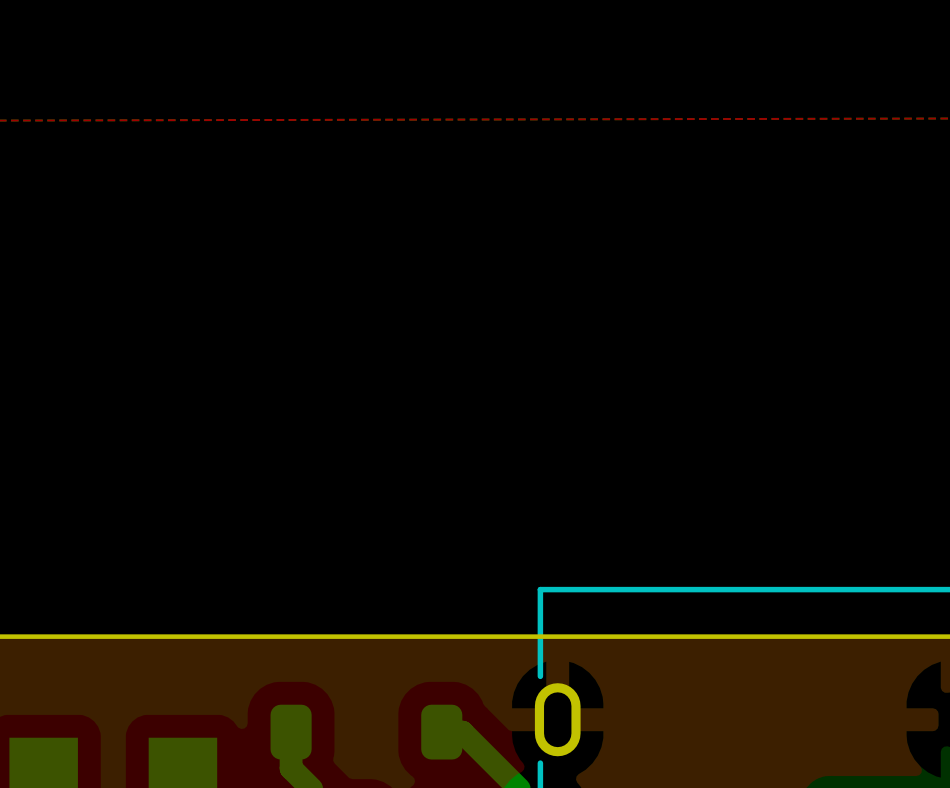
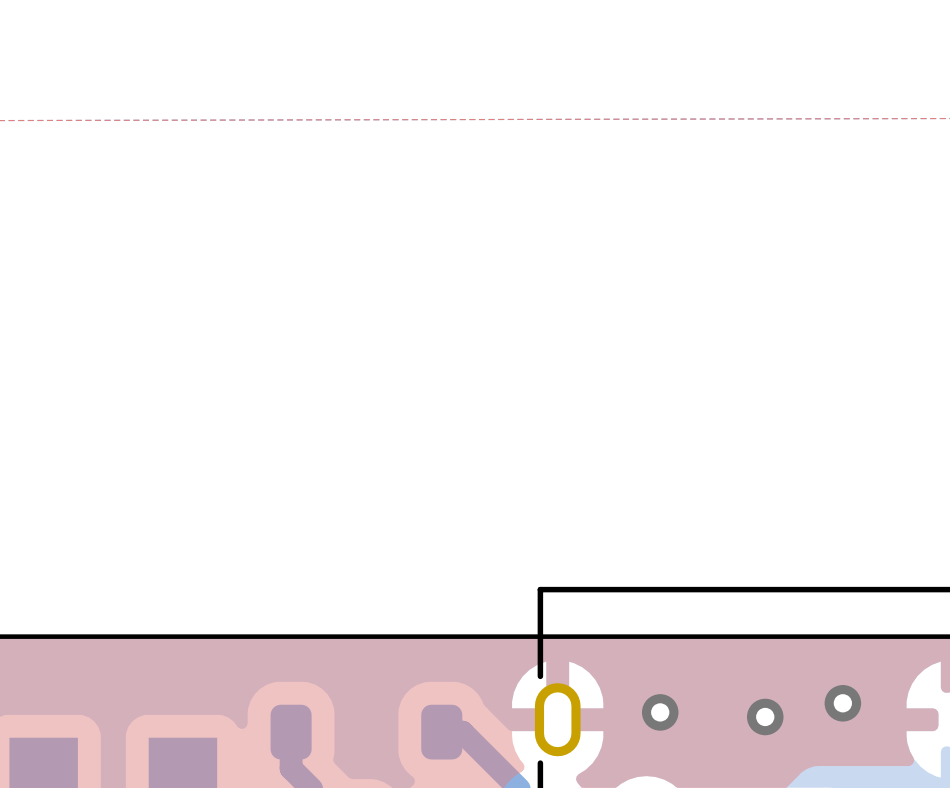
via: none -> (842, 703)
via: none -> (660, 712)
via: none -> (765, 716)

